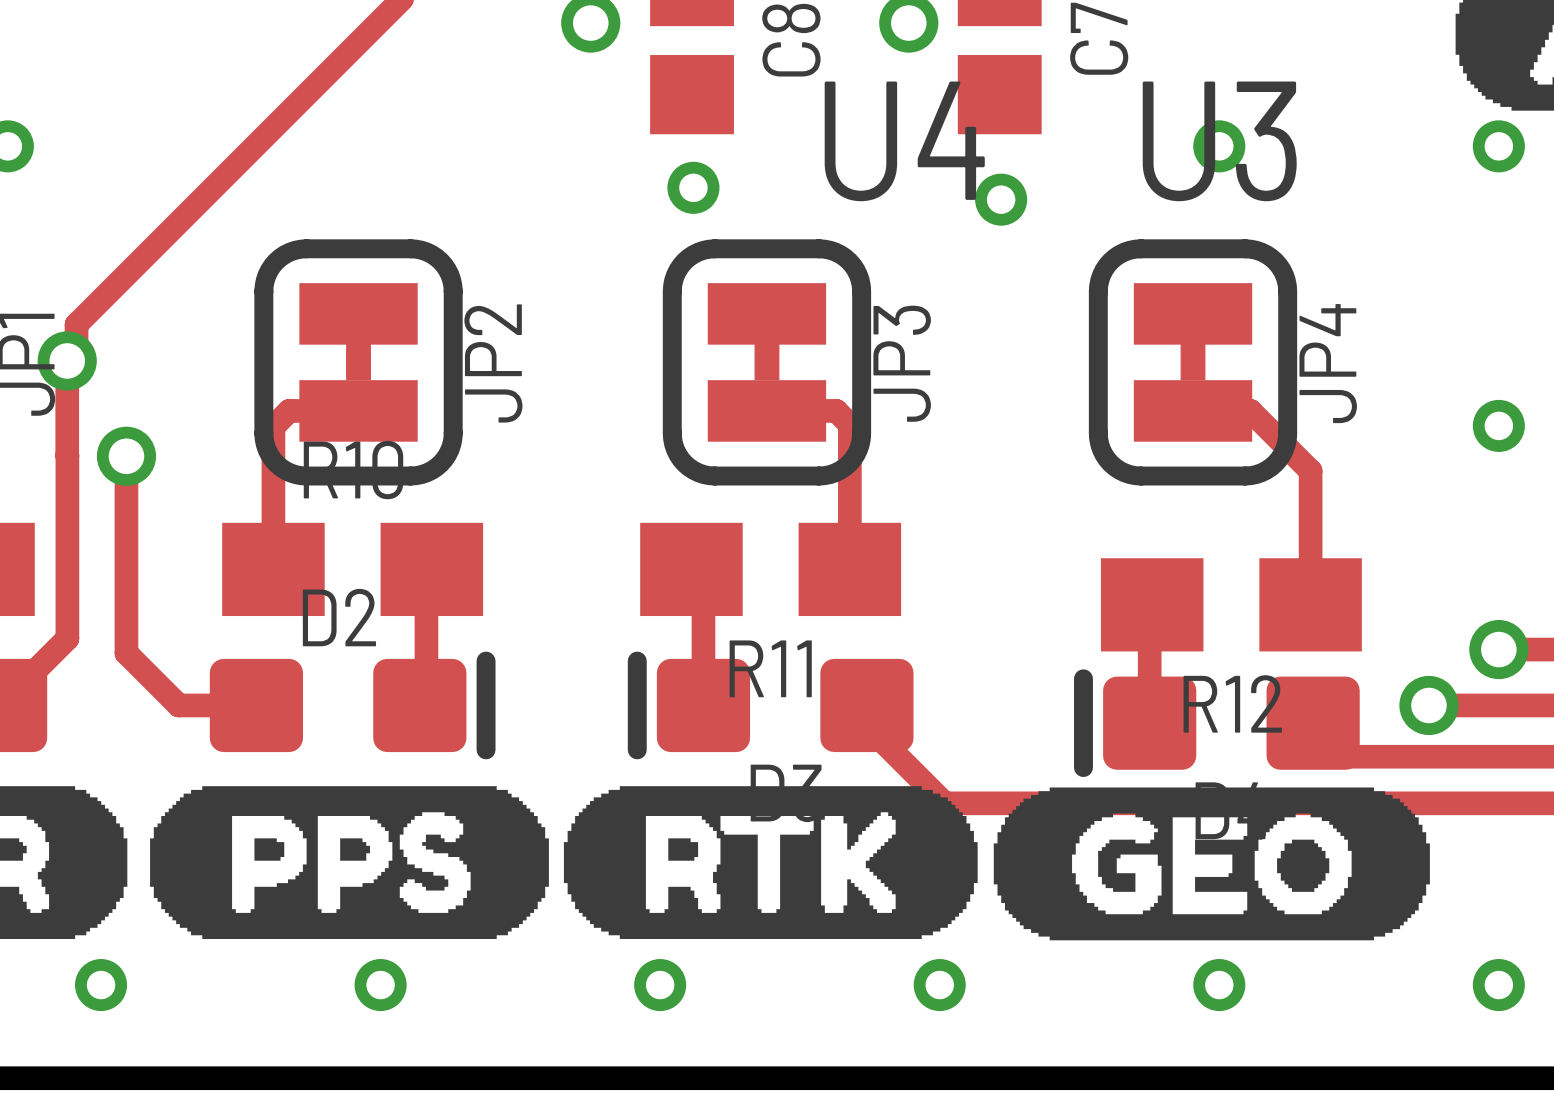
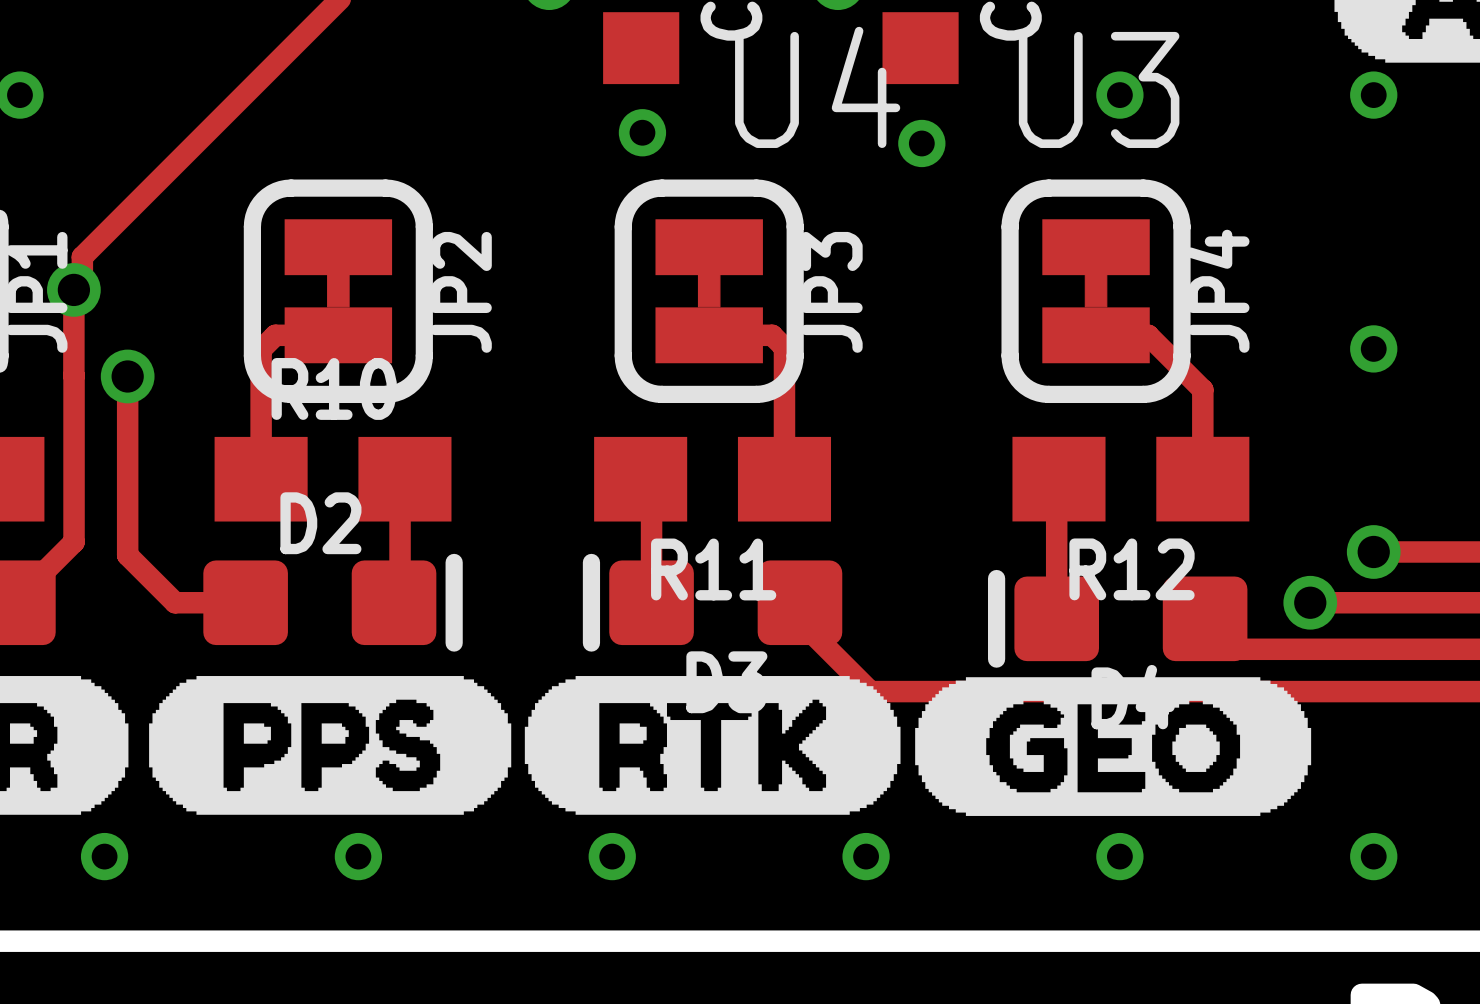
R12 position: (1231, 604) -> (1130, 479)

